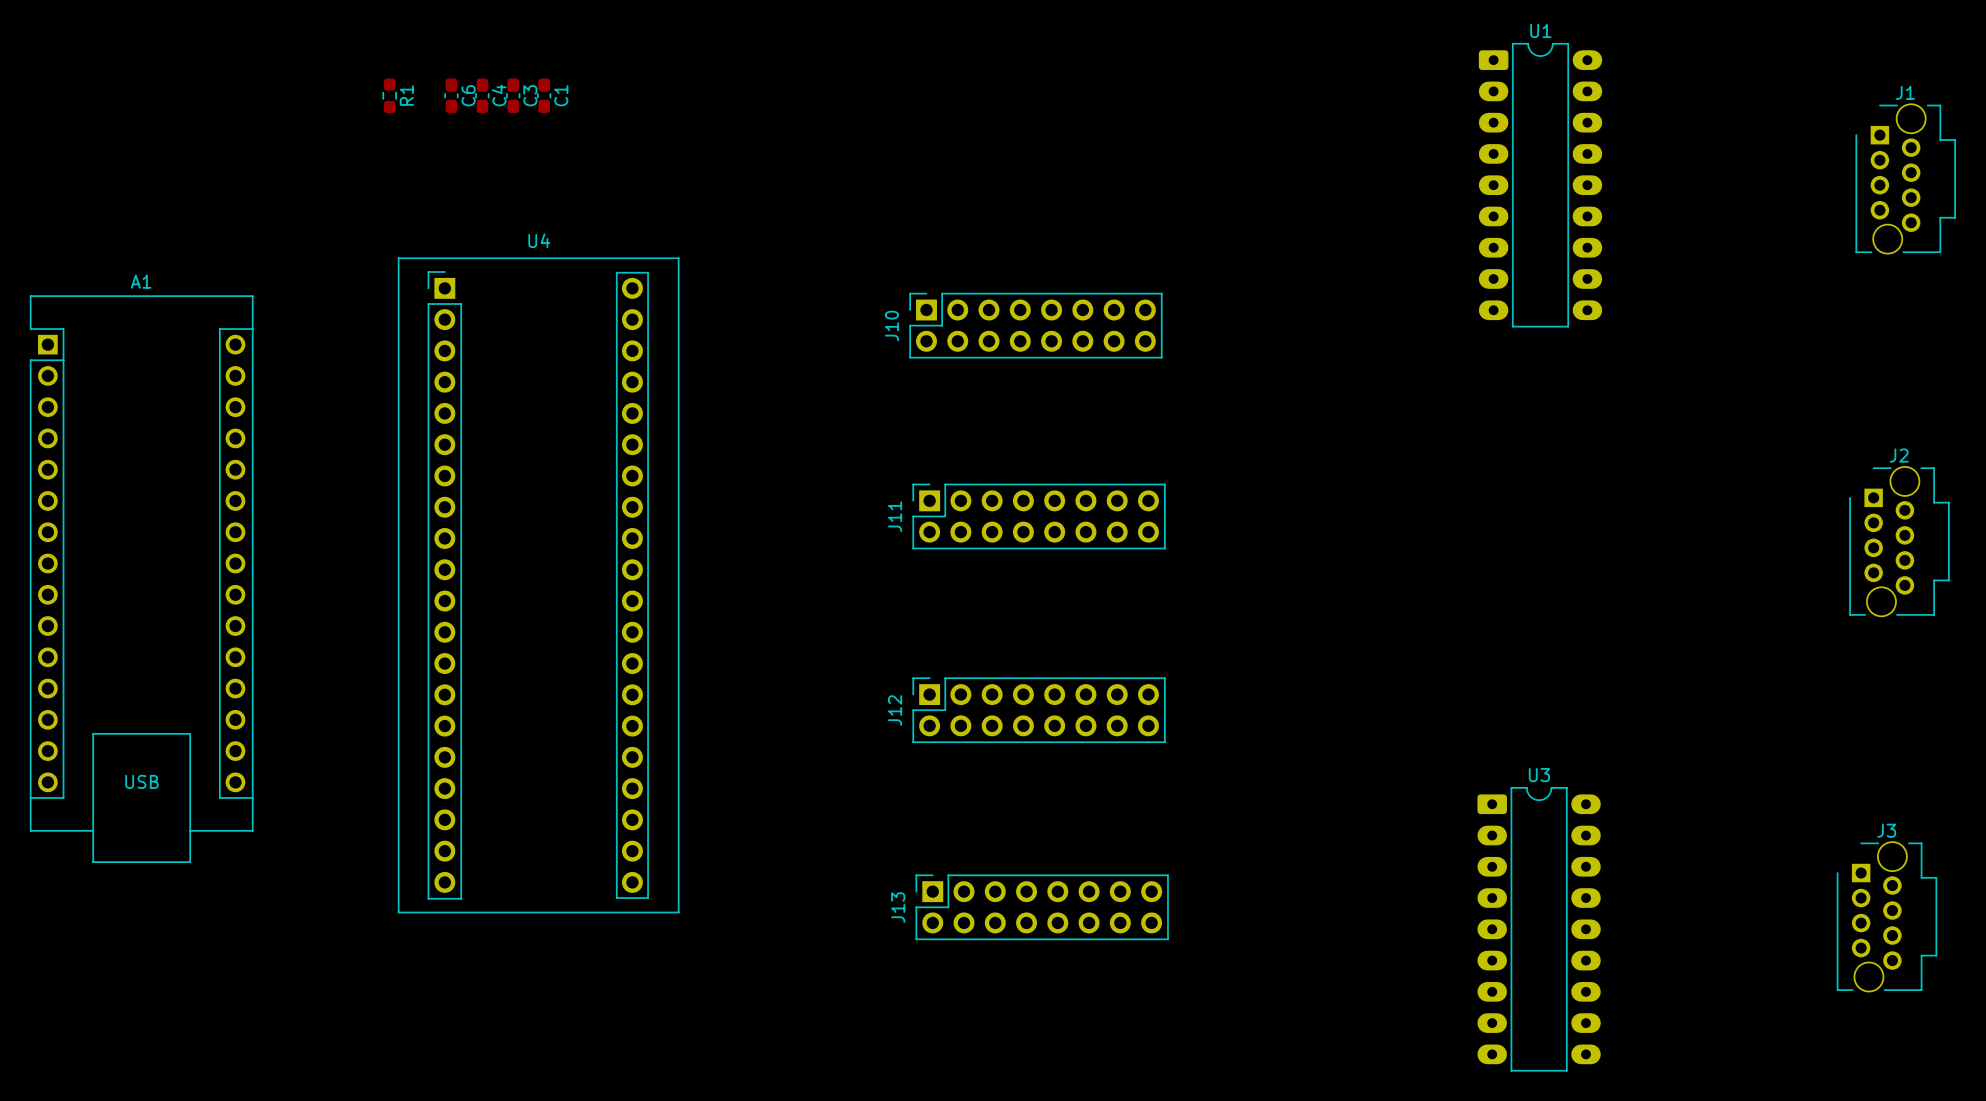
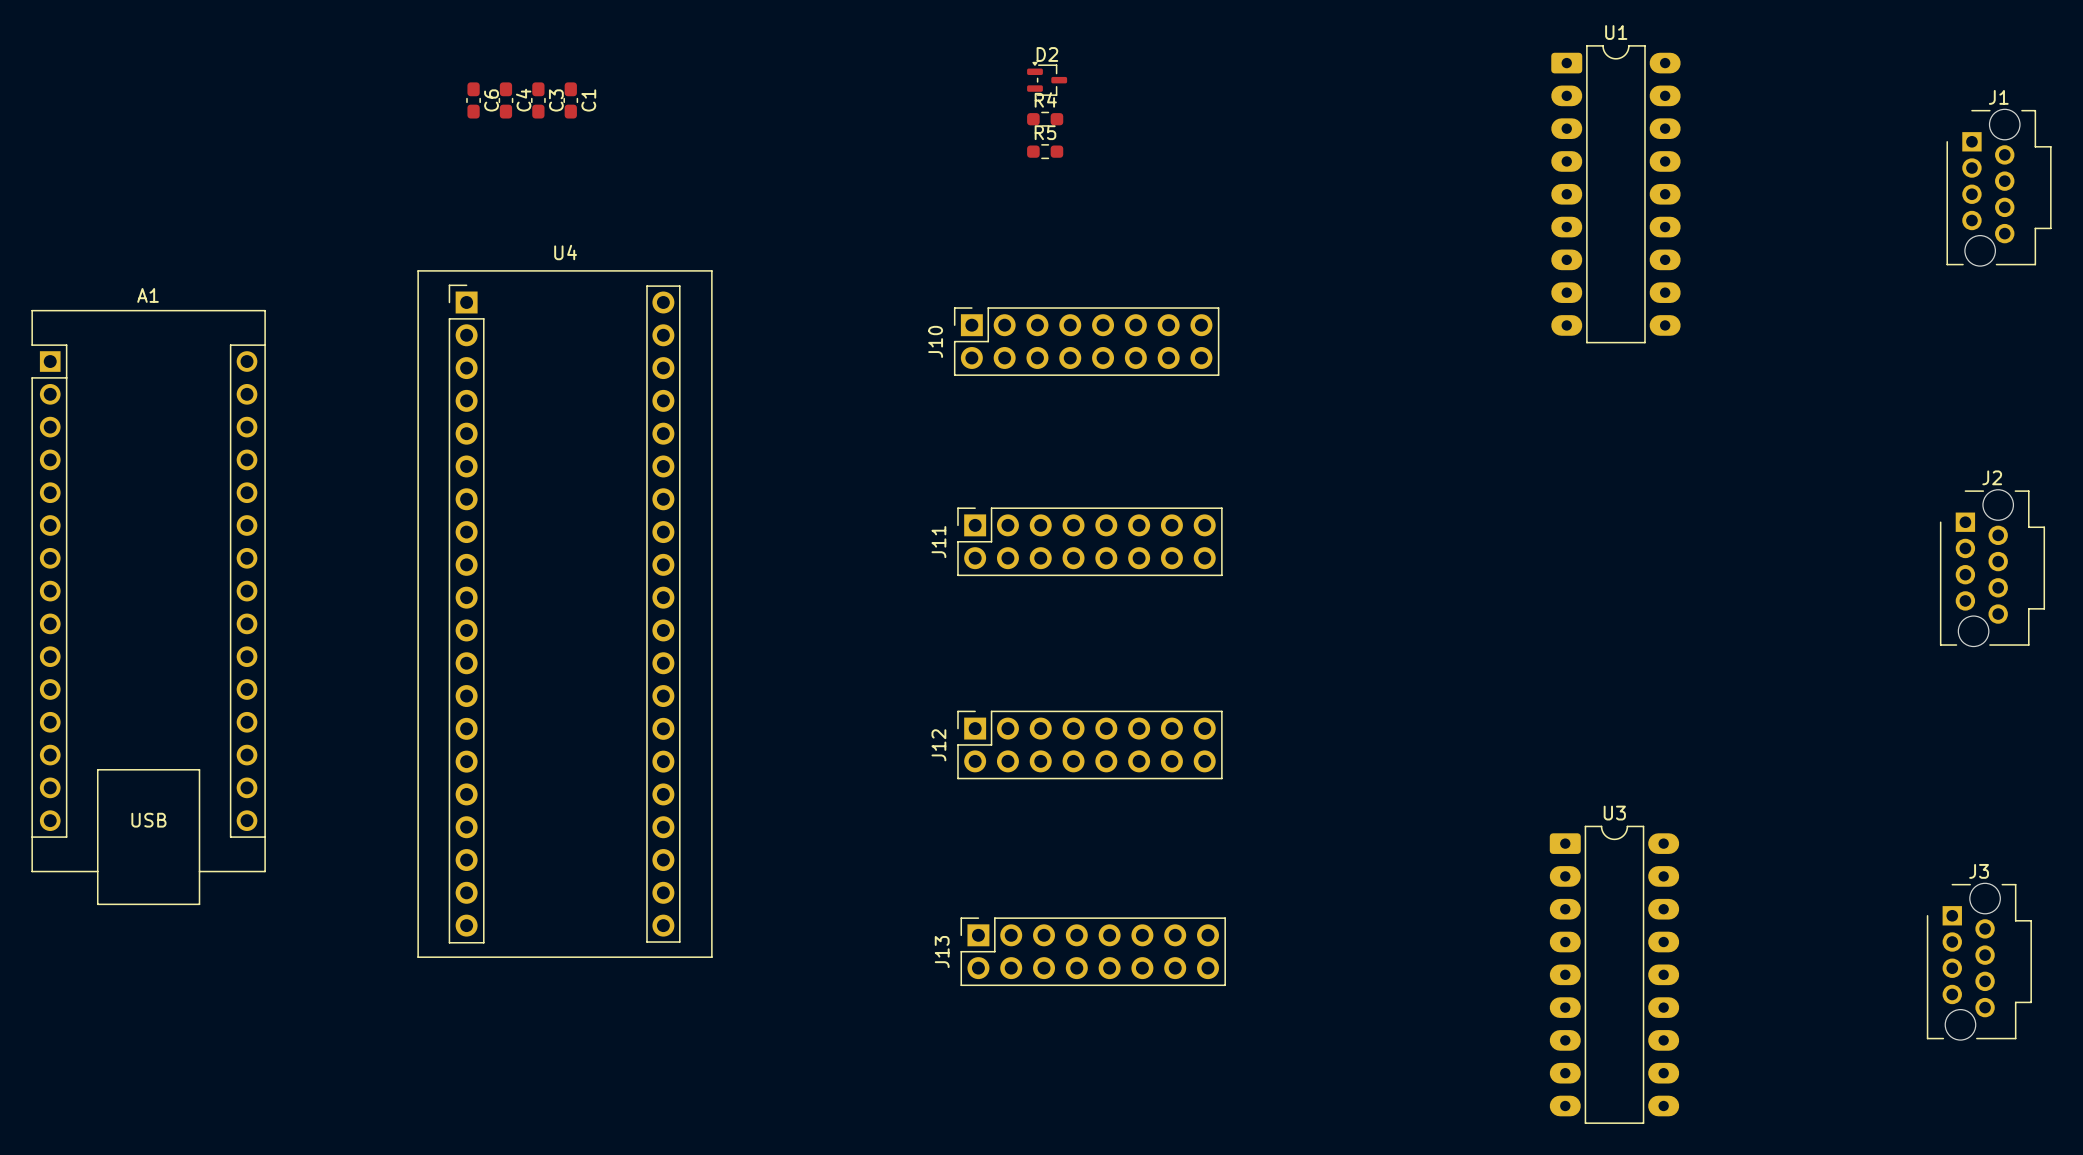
D2: none -> (1047, 78)
R1: (389, 95) -> none
R4: none -> (1045, 119)
R5: none -> (1045, 151)

